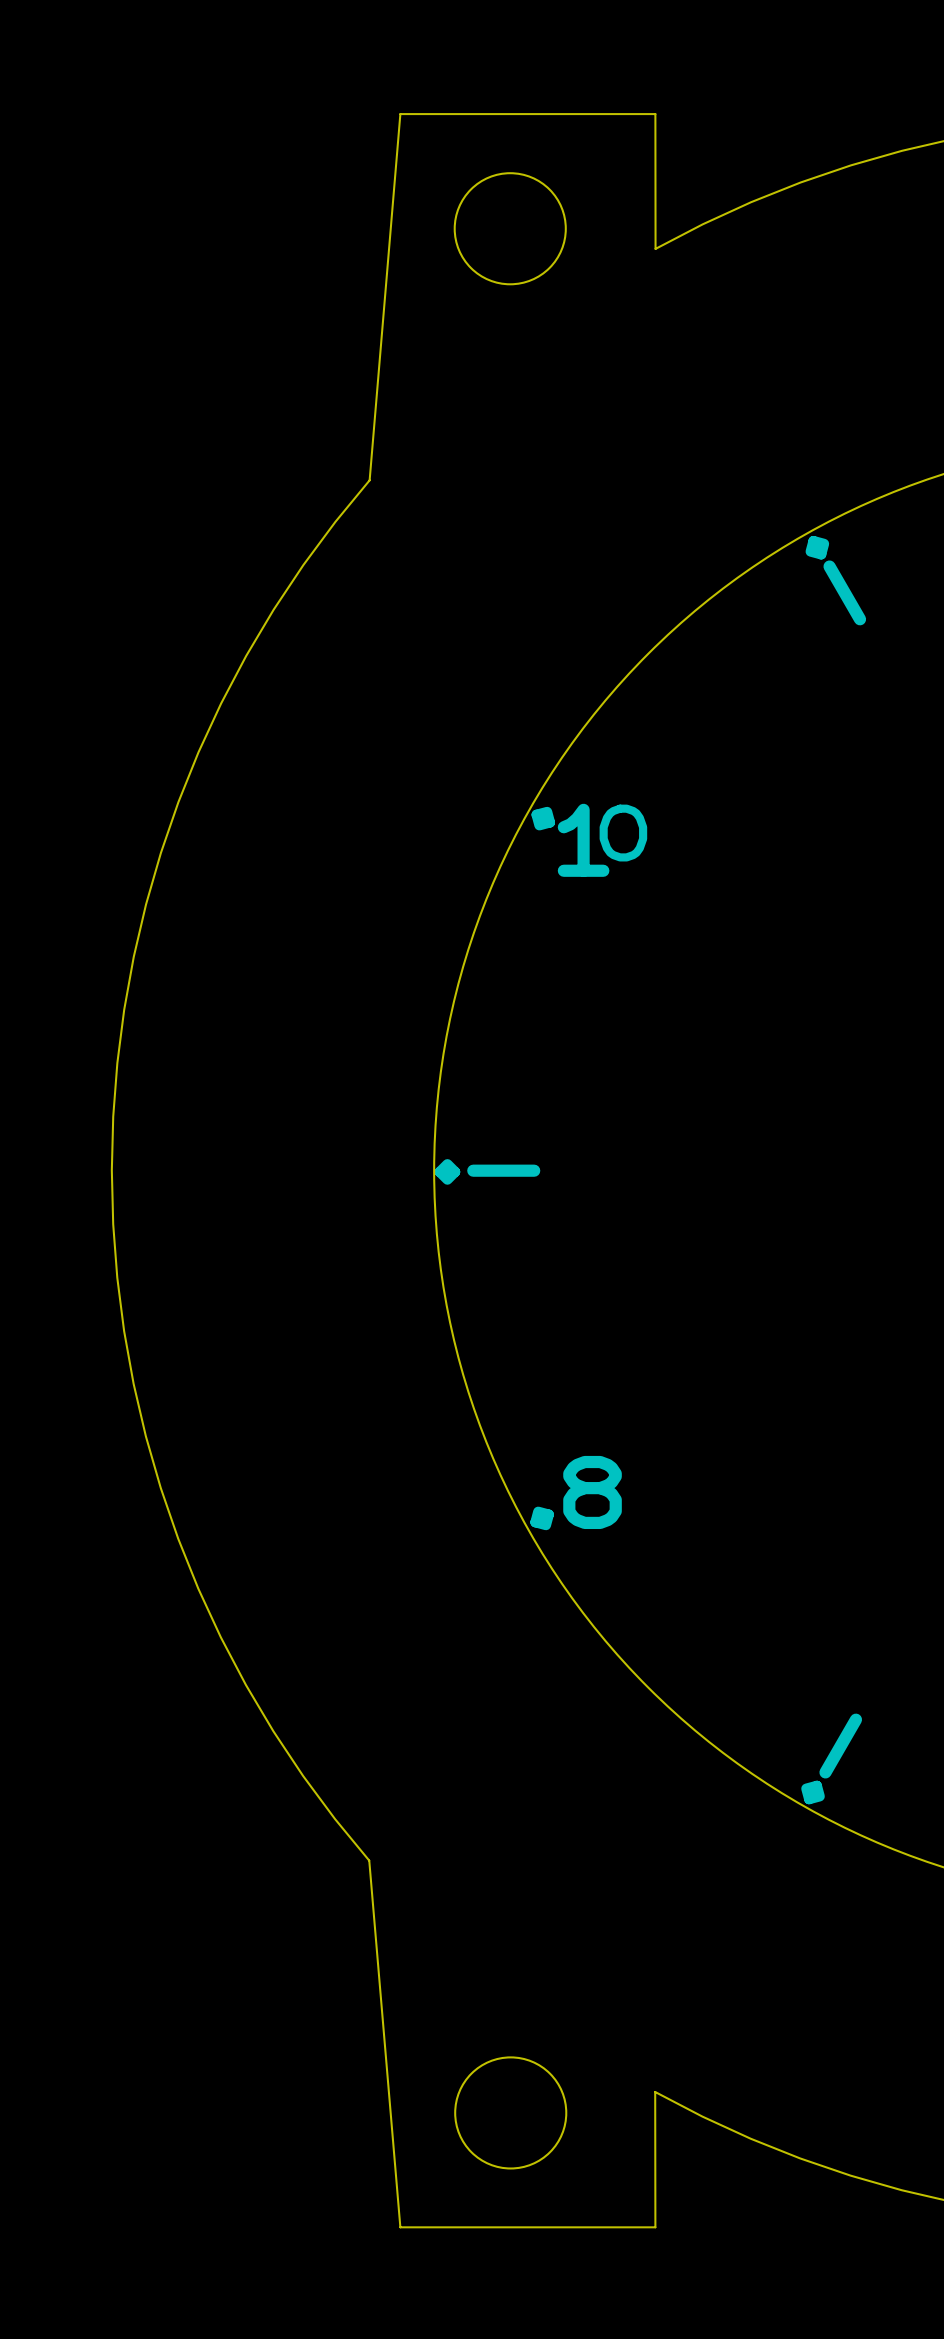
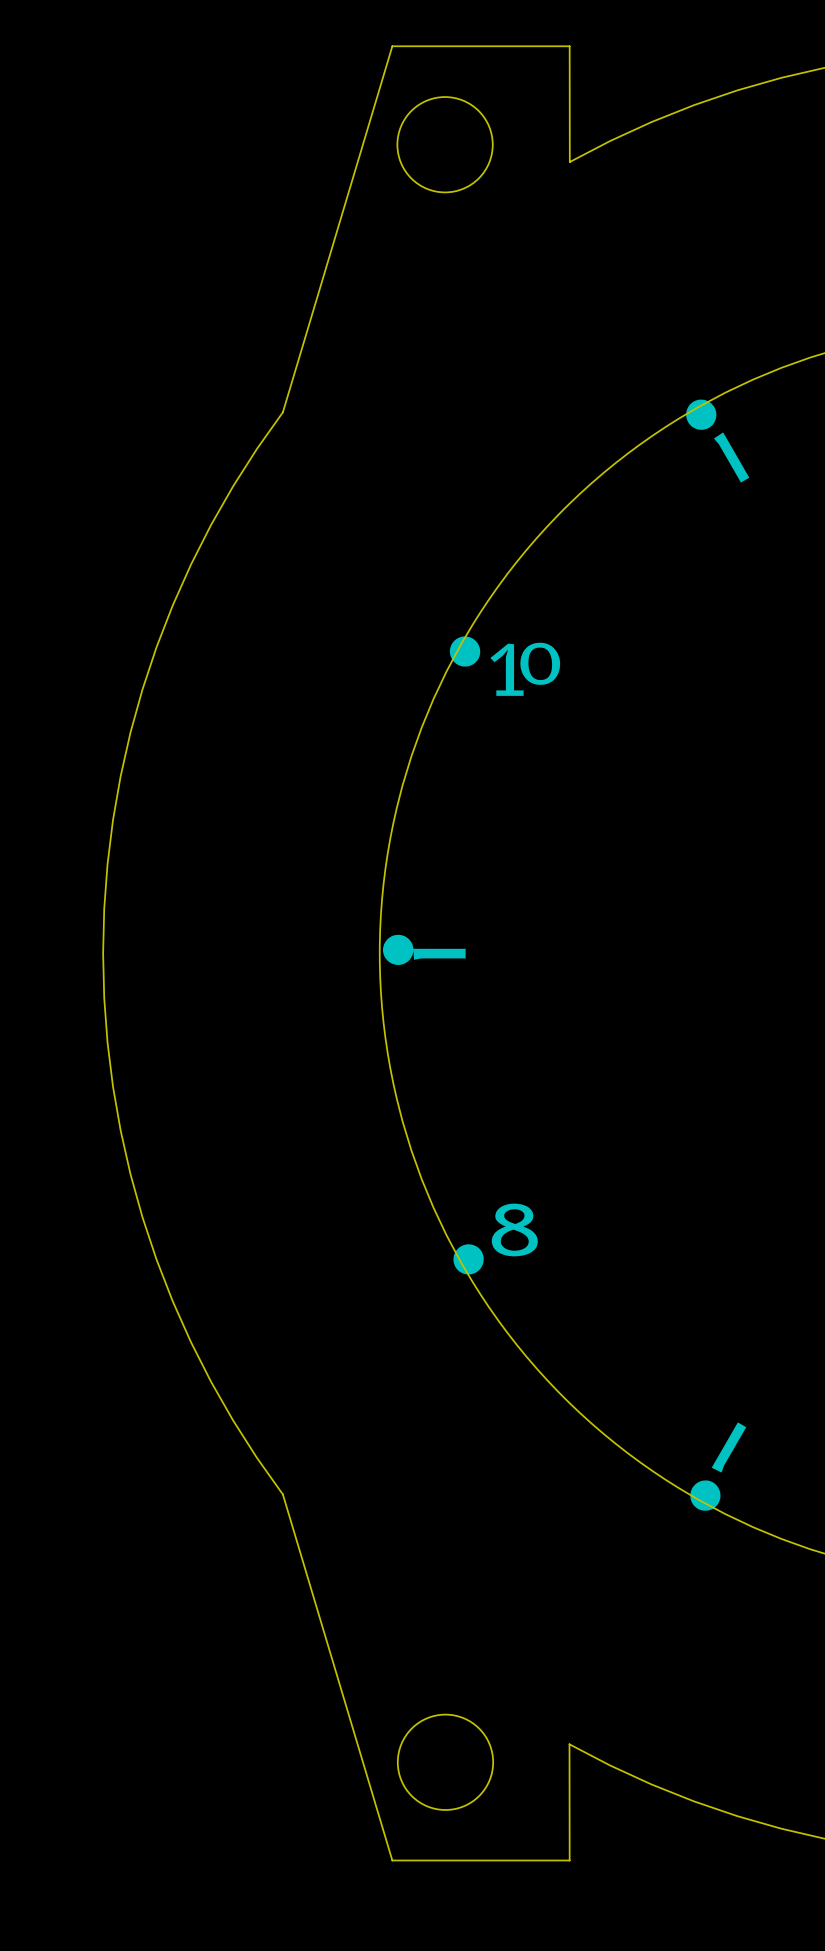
board edge: (448, 114) (400, 114) (369, 480) (303, 564) (246, 655) (198, 752) (160, 852) (133, 956) (124, 1009) (117, 1063) (111, 1170) (117, 1277) (124, 1331) (133, 1383) (160, 1487) (198, 1588) (245, 1684) (303, 1775) (369, 1860) (400, 2227) (448, 2227) -> (392, 46) (282, 412) (257, 448) (211, 525) (172, 605) (142, 689) (130, 732) (113, 820) (107, 864) (103, 953) (104, 997) (113, 1086) (120, 1130) (142, 1217) (156, 1259) (190, 1341) (233, 1420) (282, 1494) (392, 1860)

